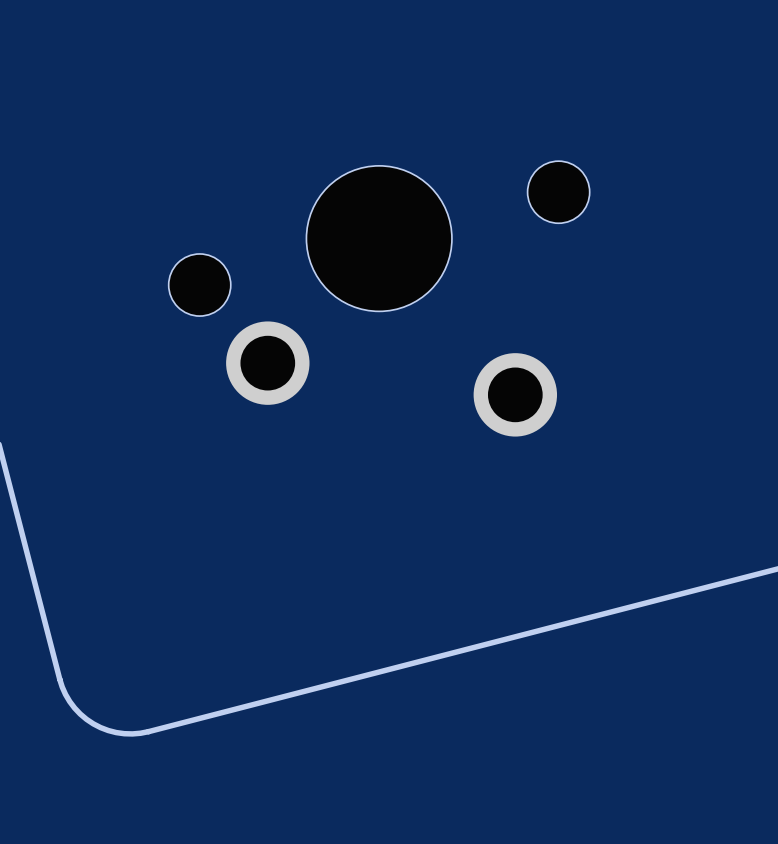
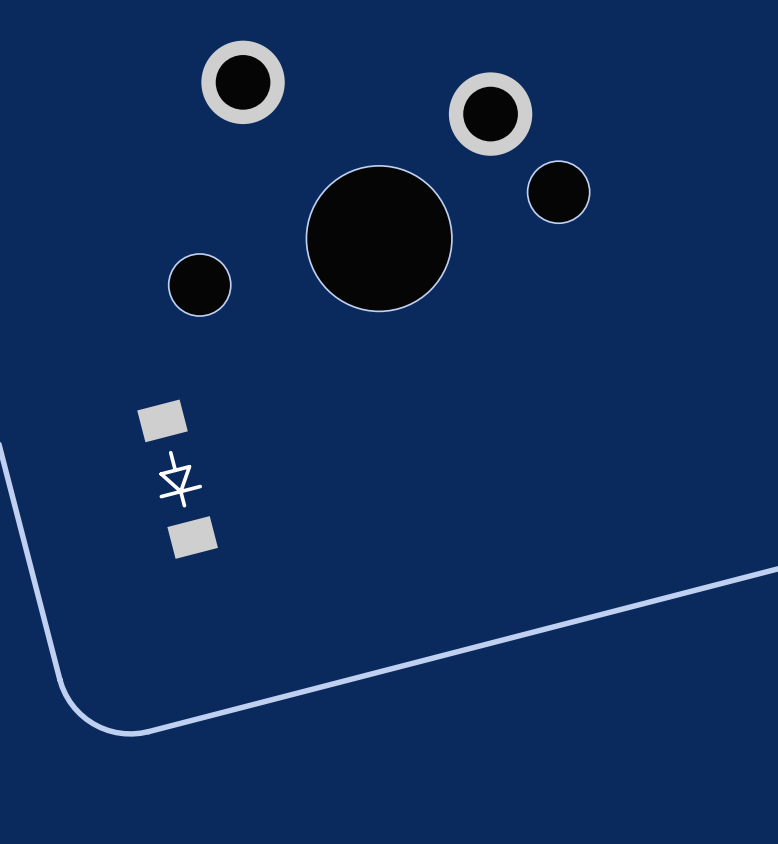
part rotation: 0° (379, 298) -> 180° (379, 178)
part: none -> (177, 479)

